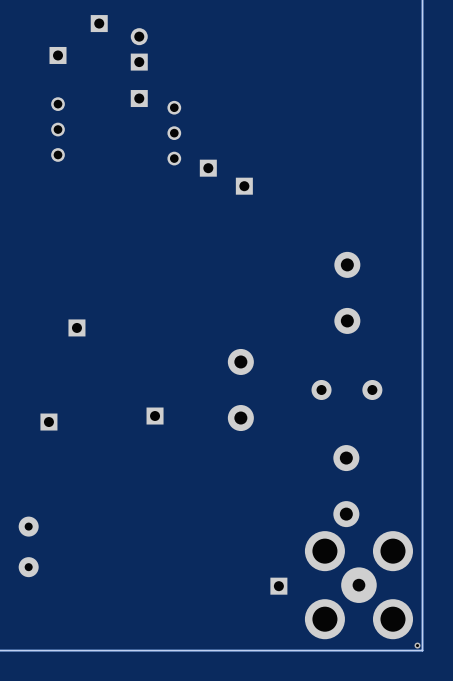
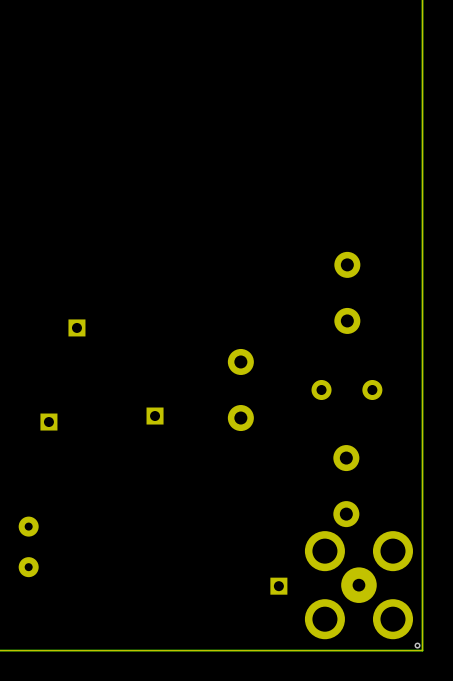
part: (99, 23) -> none
part: (139, 49) -> none
part: (58, 55) -> none
part: (139, 98) -> none
part: (58, 129) -> none
part: (174, 133) -> none
part: (208, 168) -> none
part: (244, 186) -> none

